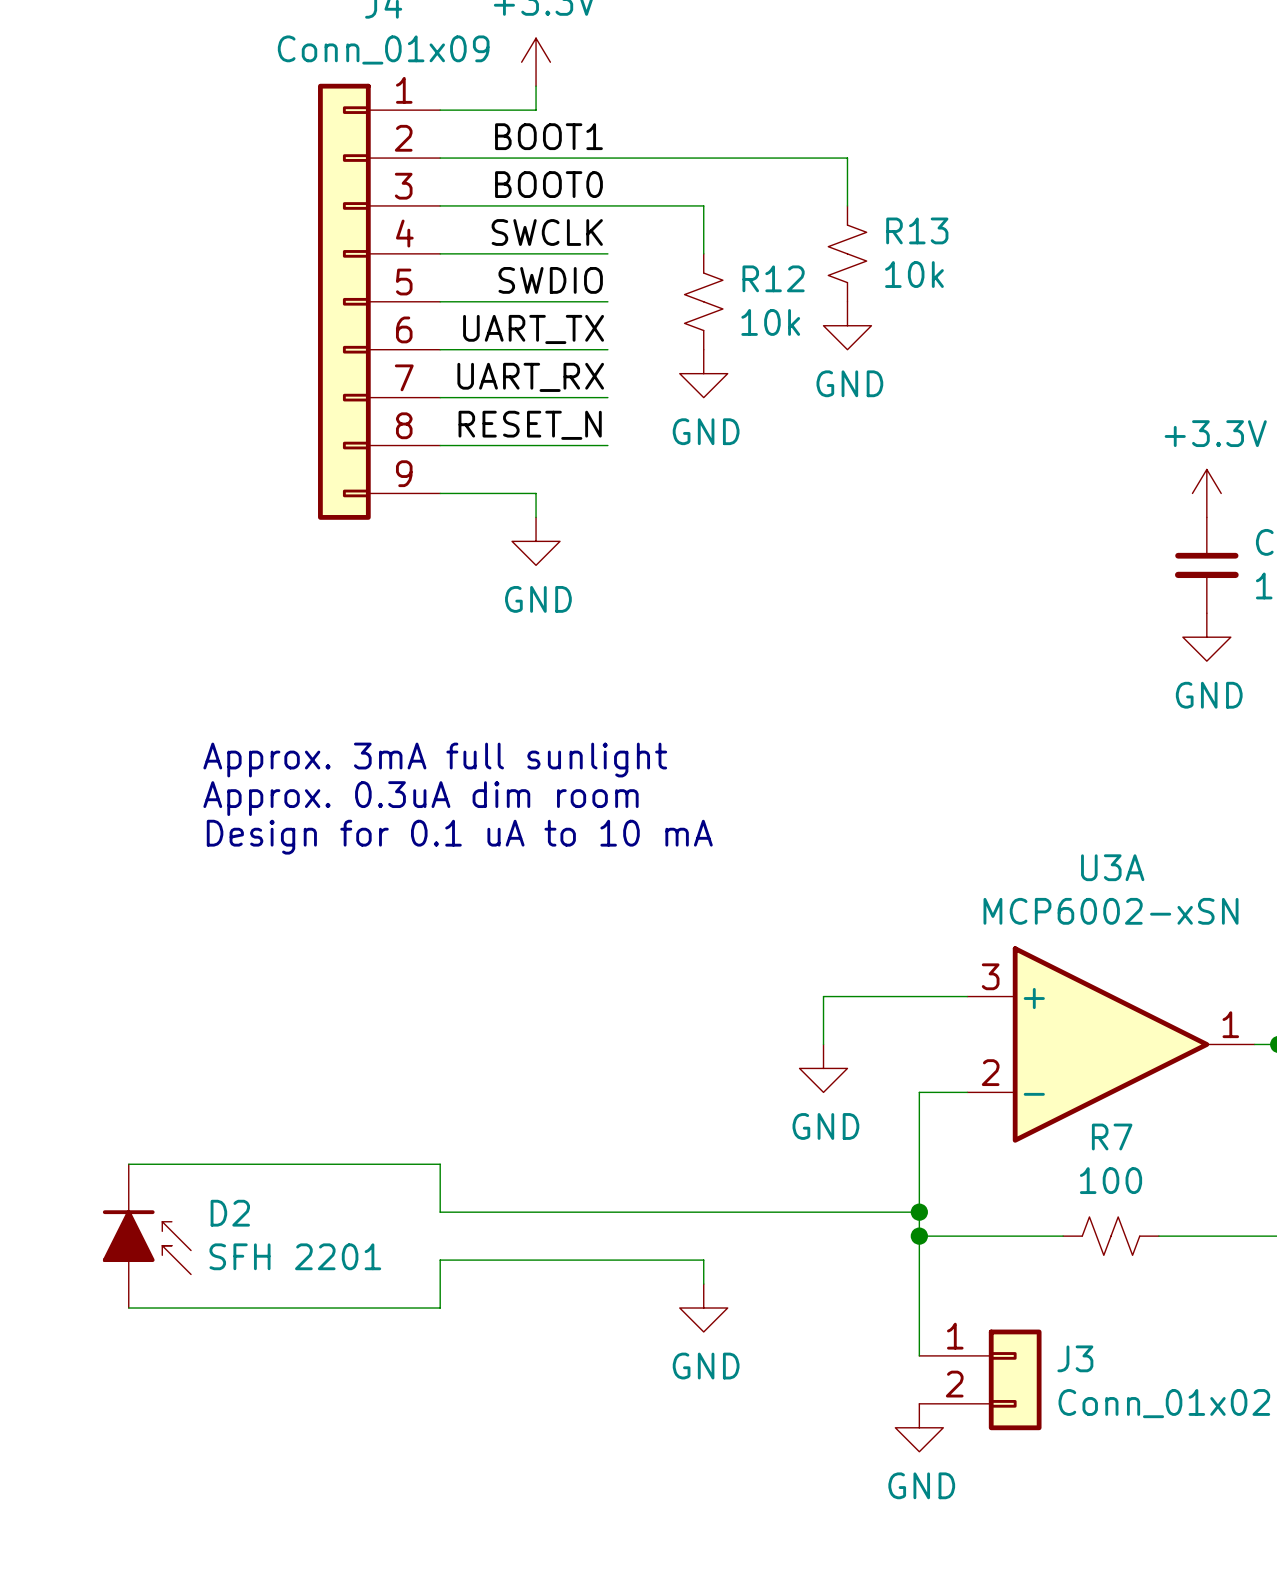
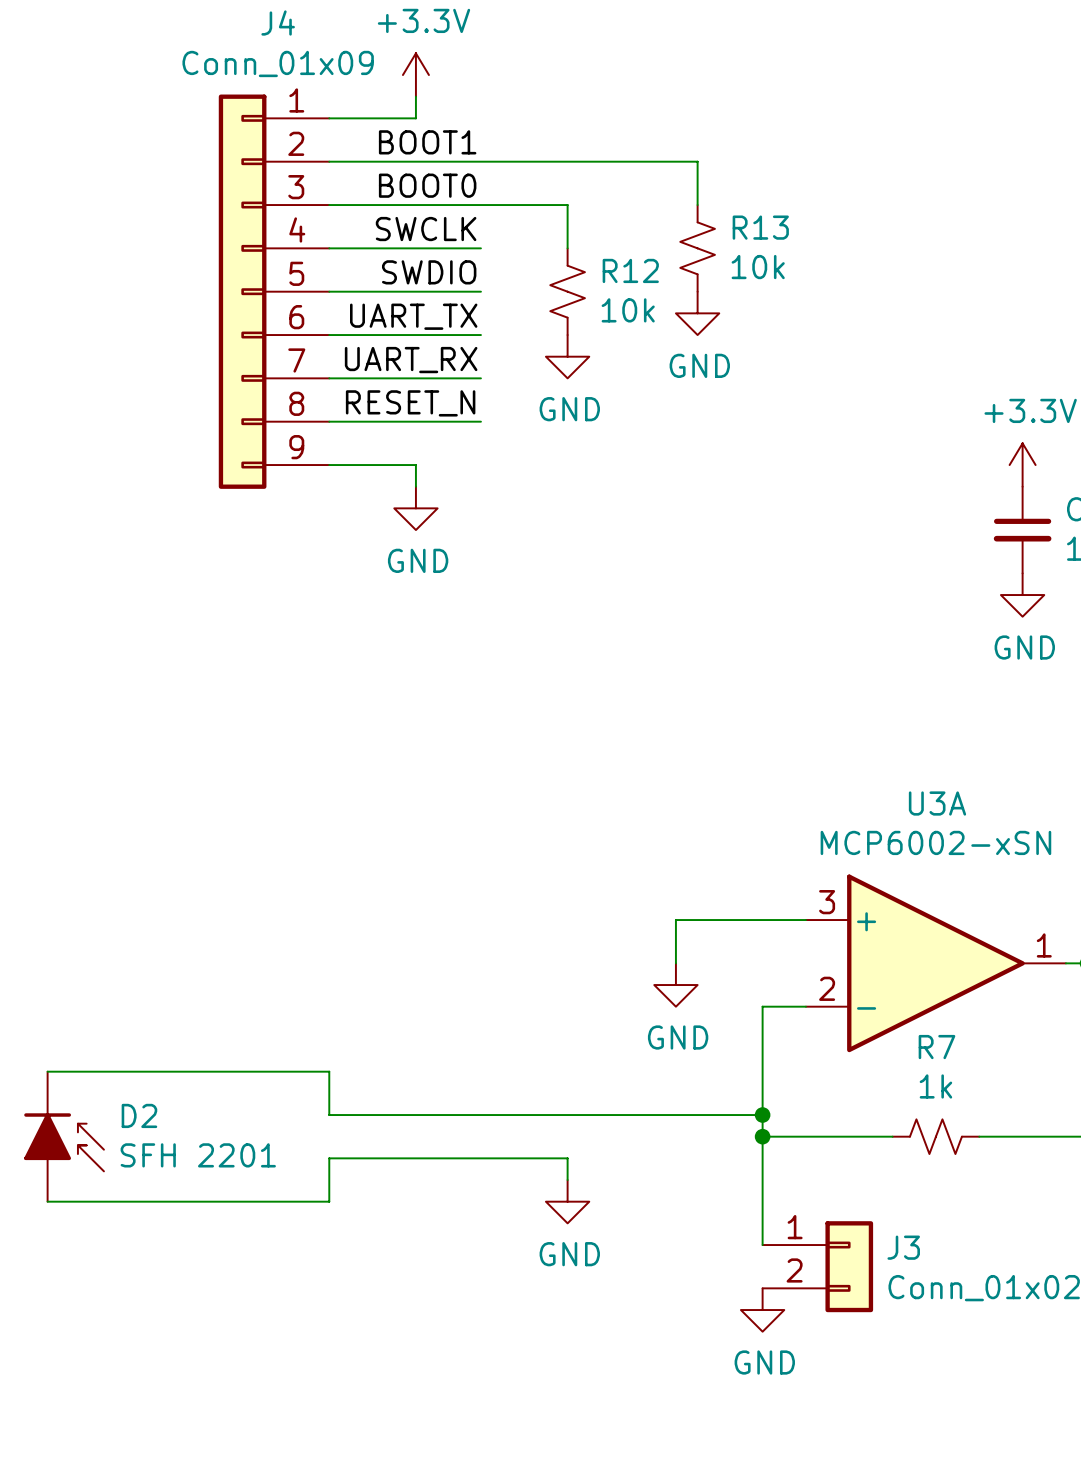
text: Approx. 3mA full sunlight (435, 760) -> none
text: Approx. 0.3uA dim room (420, 798) -> none
text: Design for 0.1 uA to 10 mA (459, 837) -> none
R7 value: 100 (1111, 1180) -> 1k (935, 1086)

